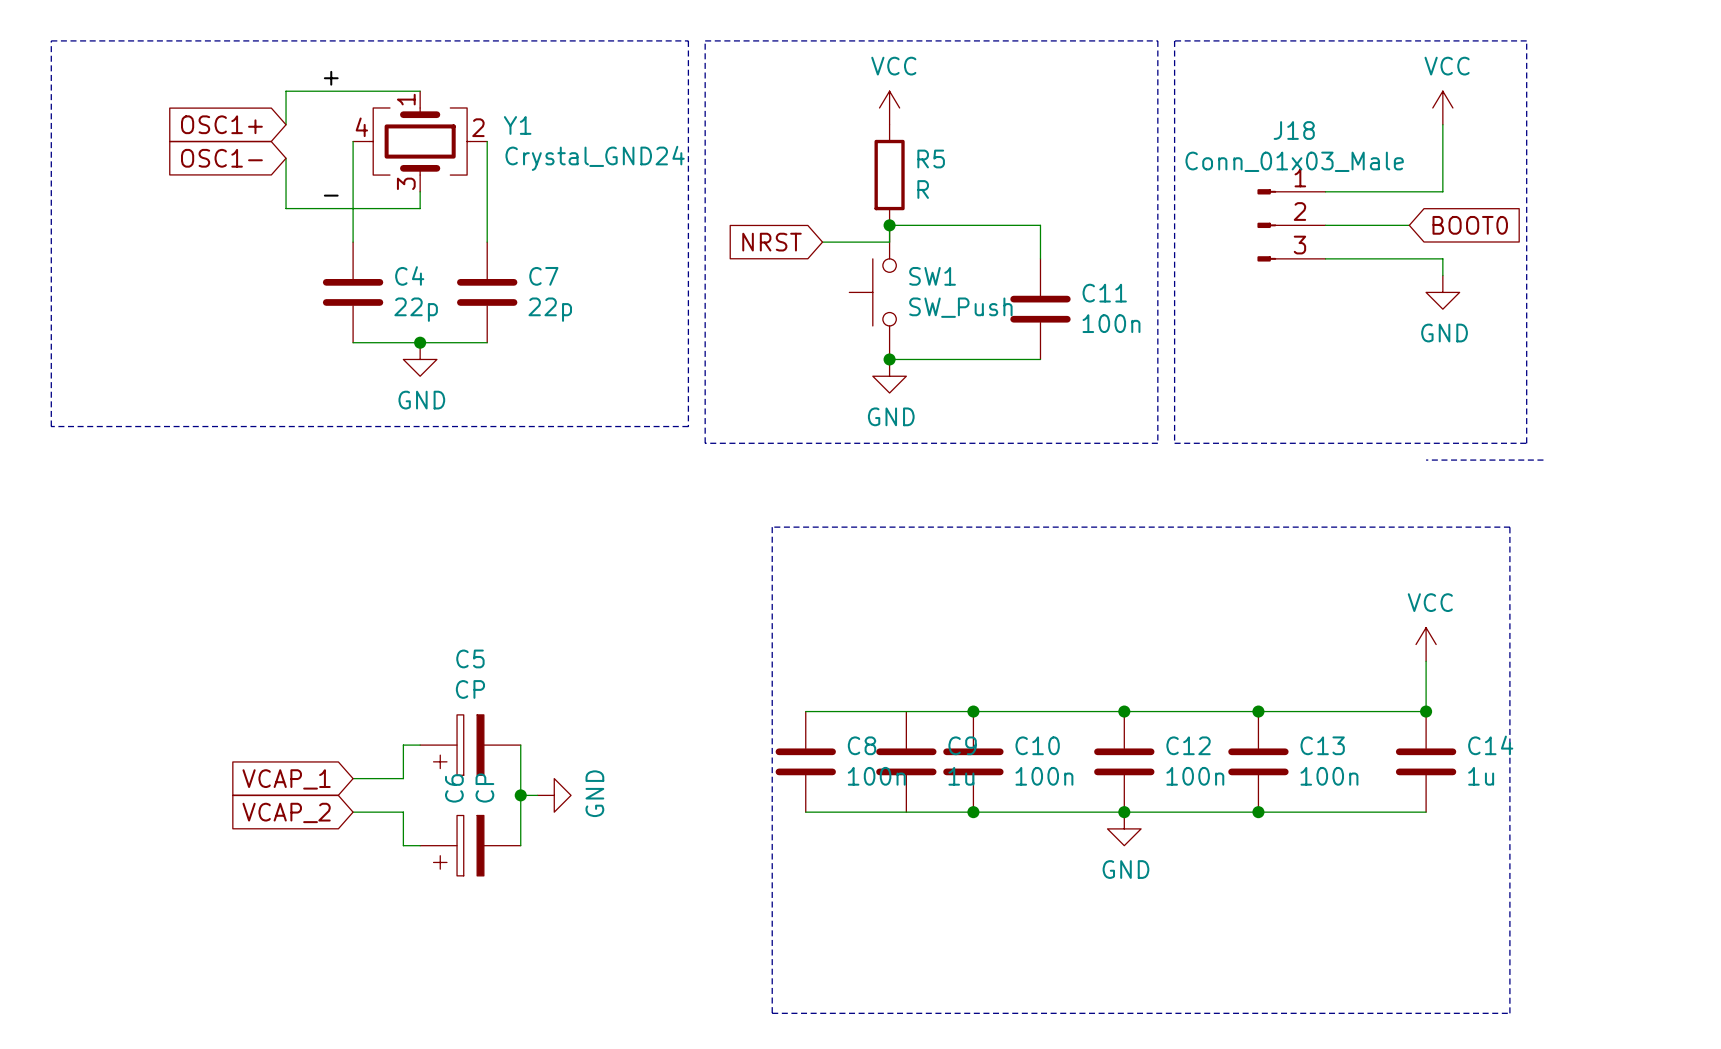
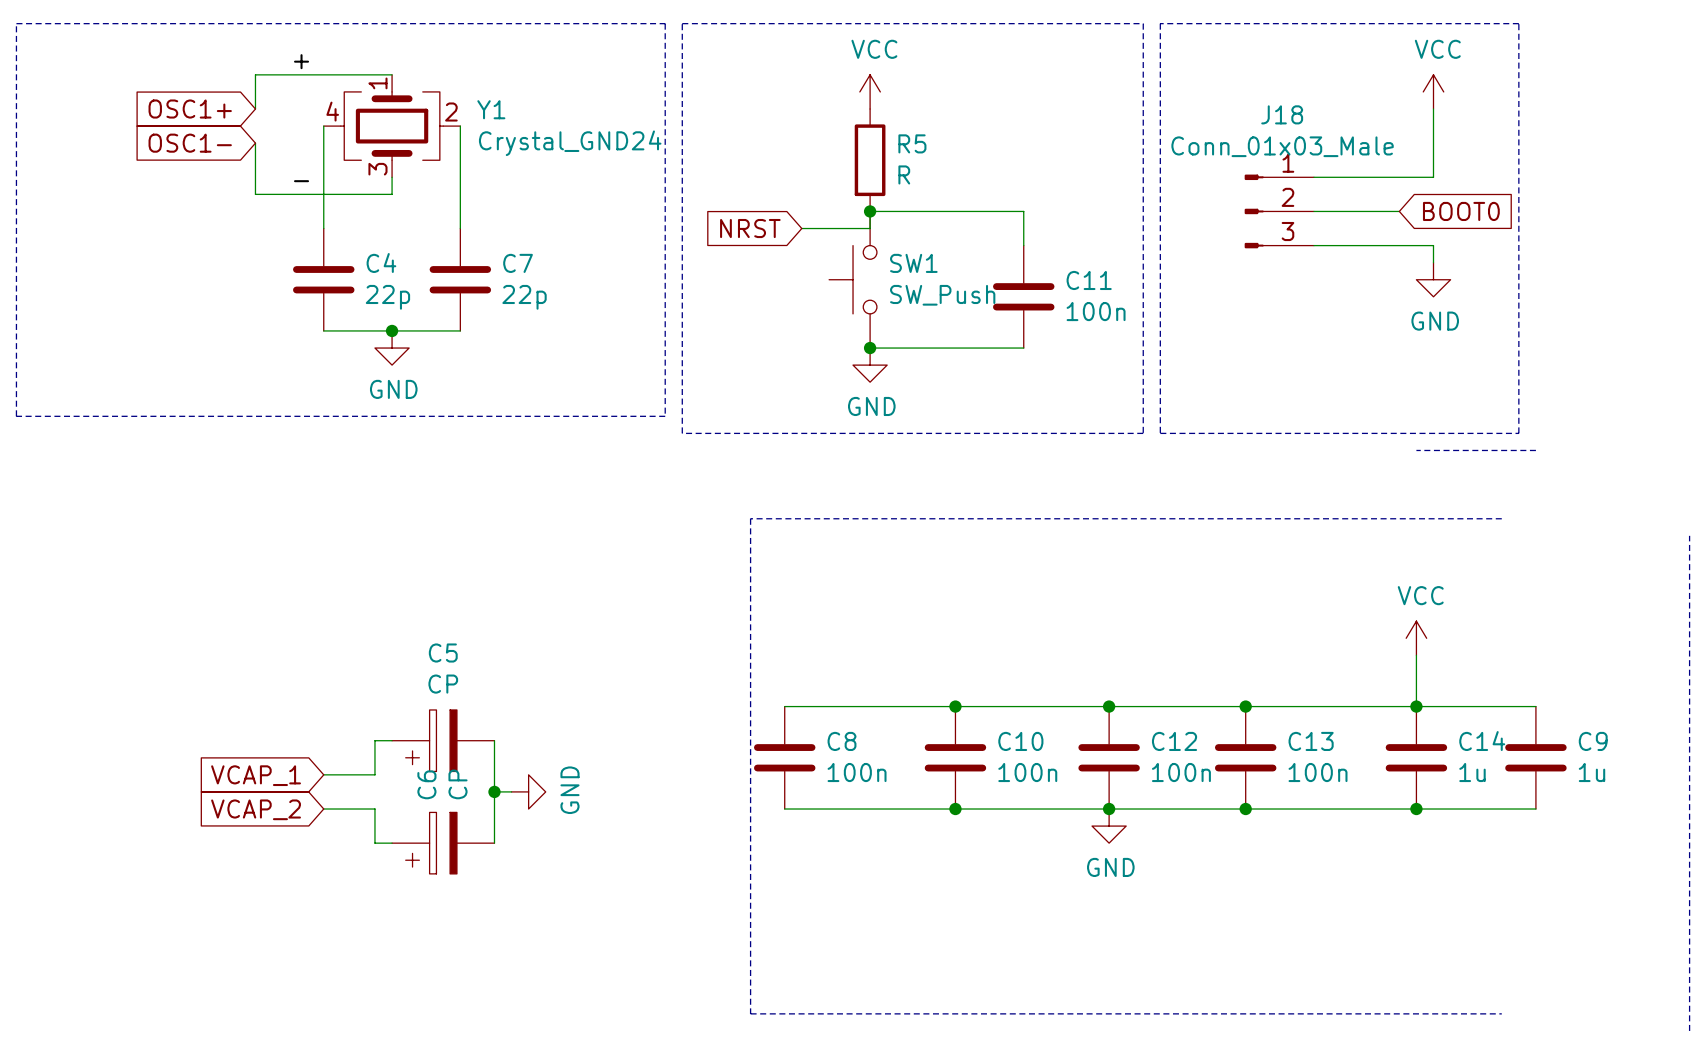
line: (1509, 527) (1509, 1013) -> (1689, 535) (1689, 1030)
wire: none -> (1416, 706) (1535, 706)
C9 position: (906, 761) -> (1535, 757)
wire: none -> (1416, 809) (1535, 809)
junction: none -> (1416, 809)

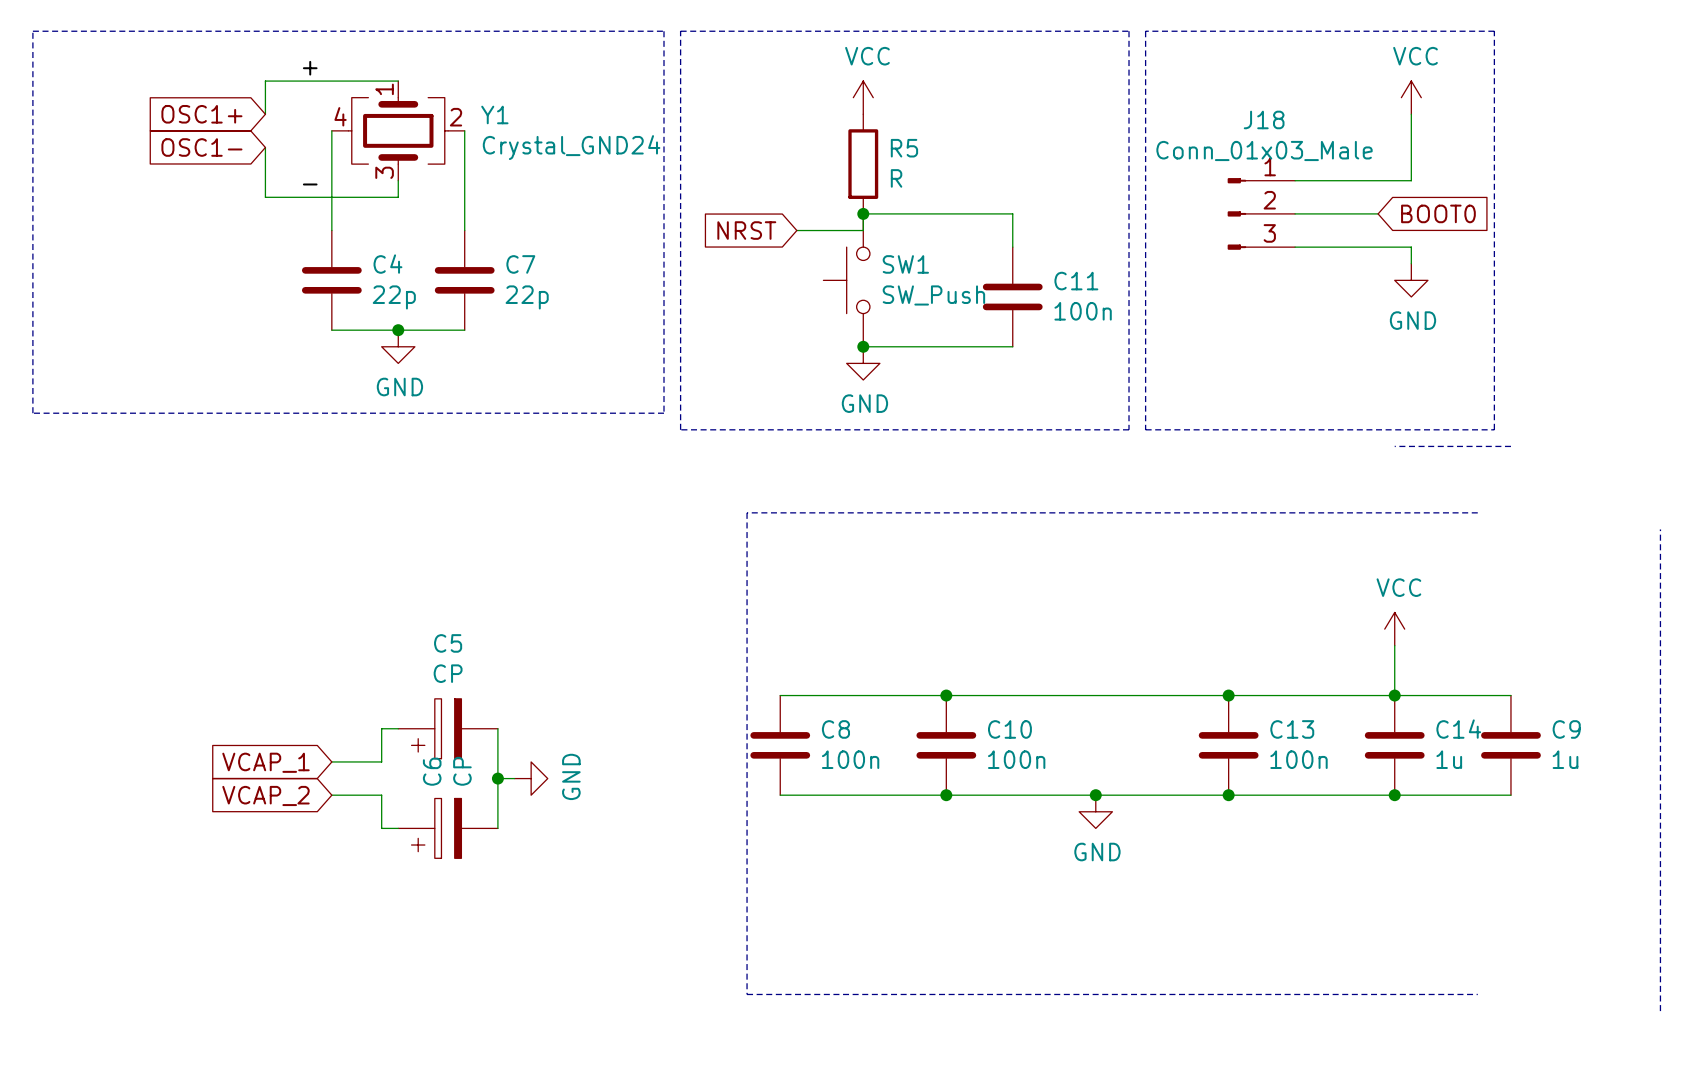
junction: (1109, 706) -> none
C12: 100n (1109, 757) -> none

